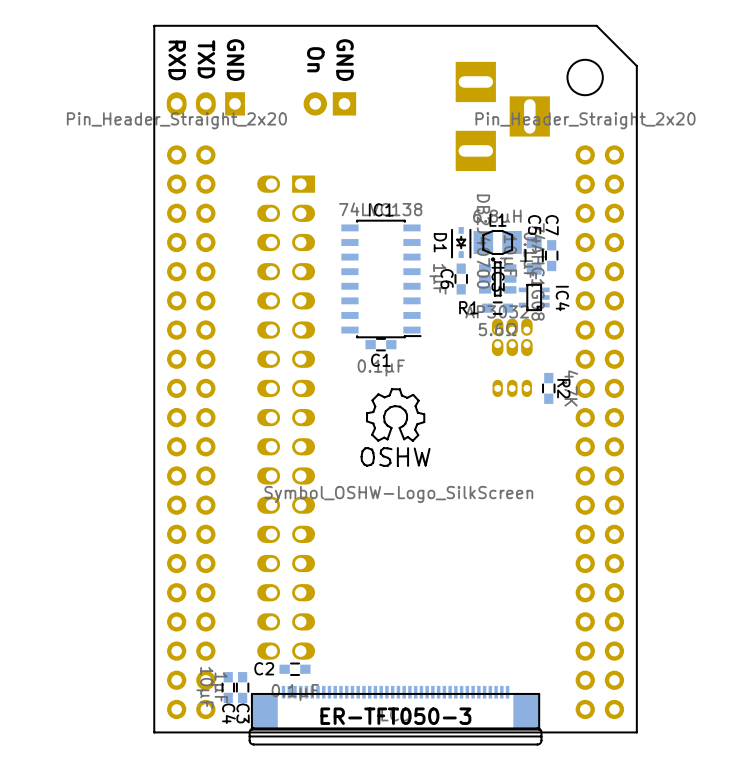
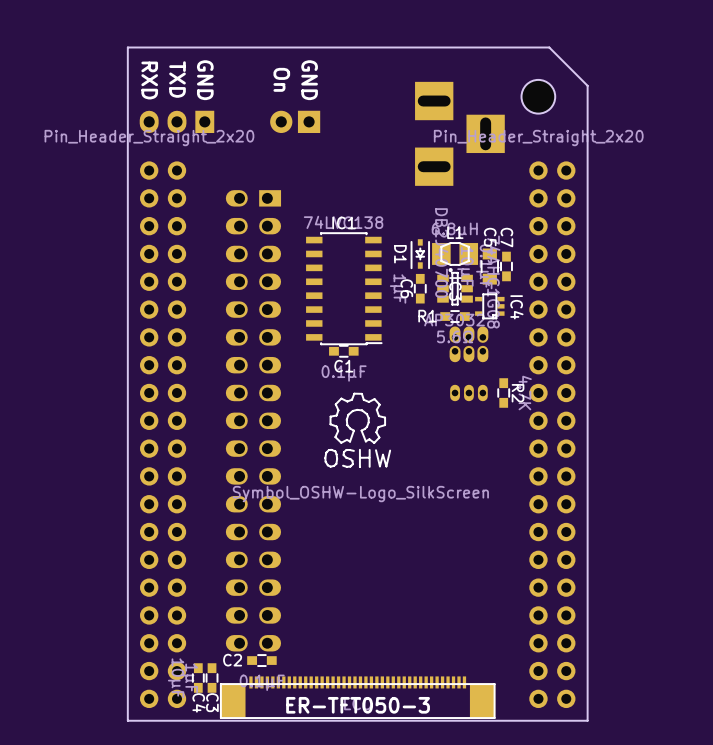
part footprint: [248, 685, 543, 746] -> [220, 676, 496, 719]

